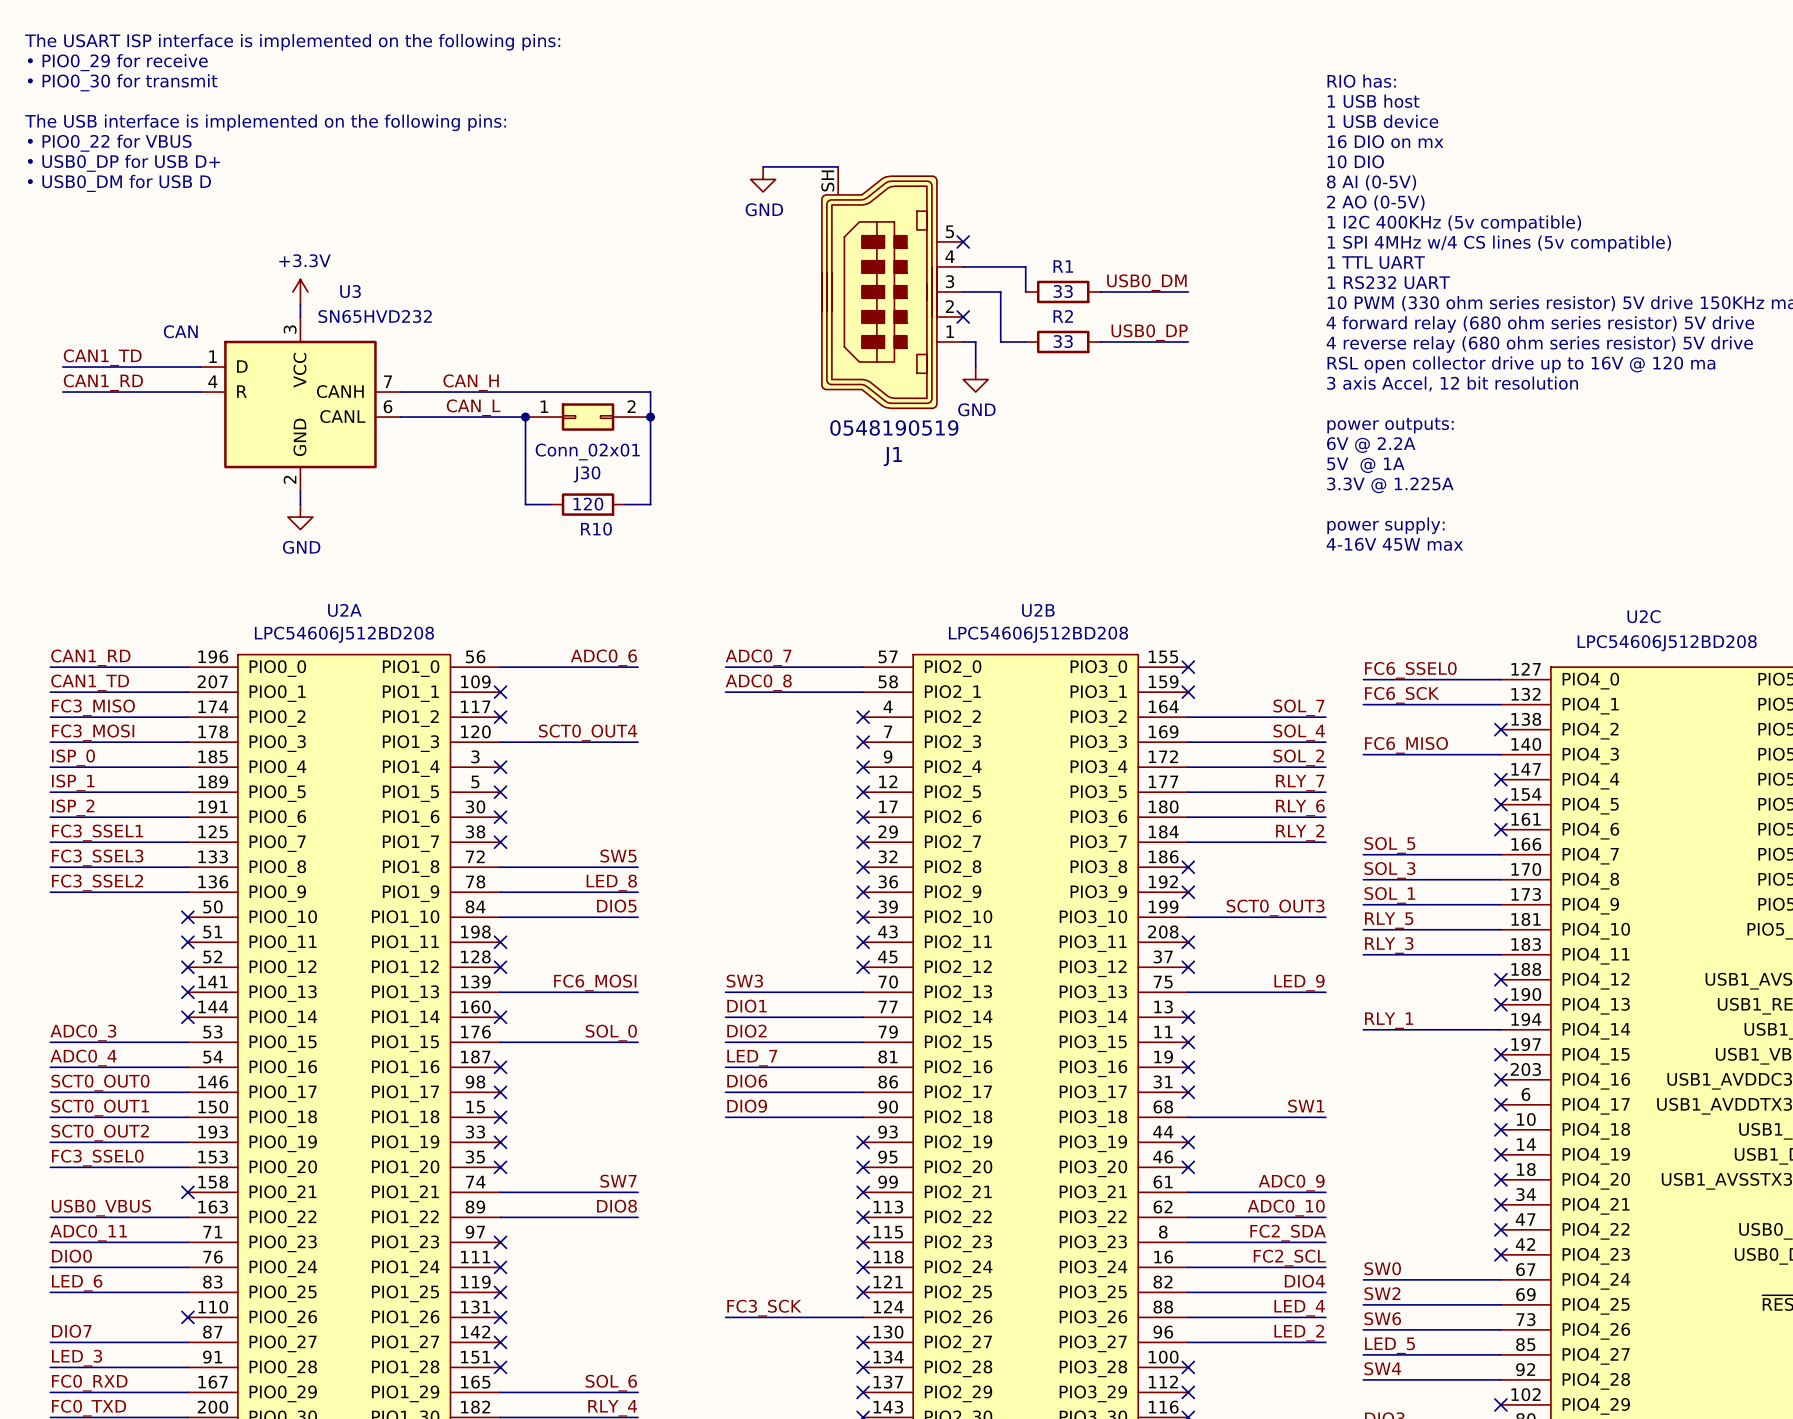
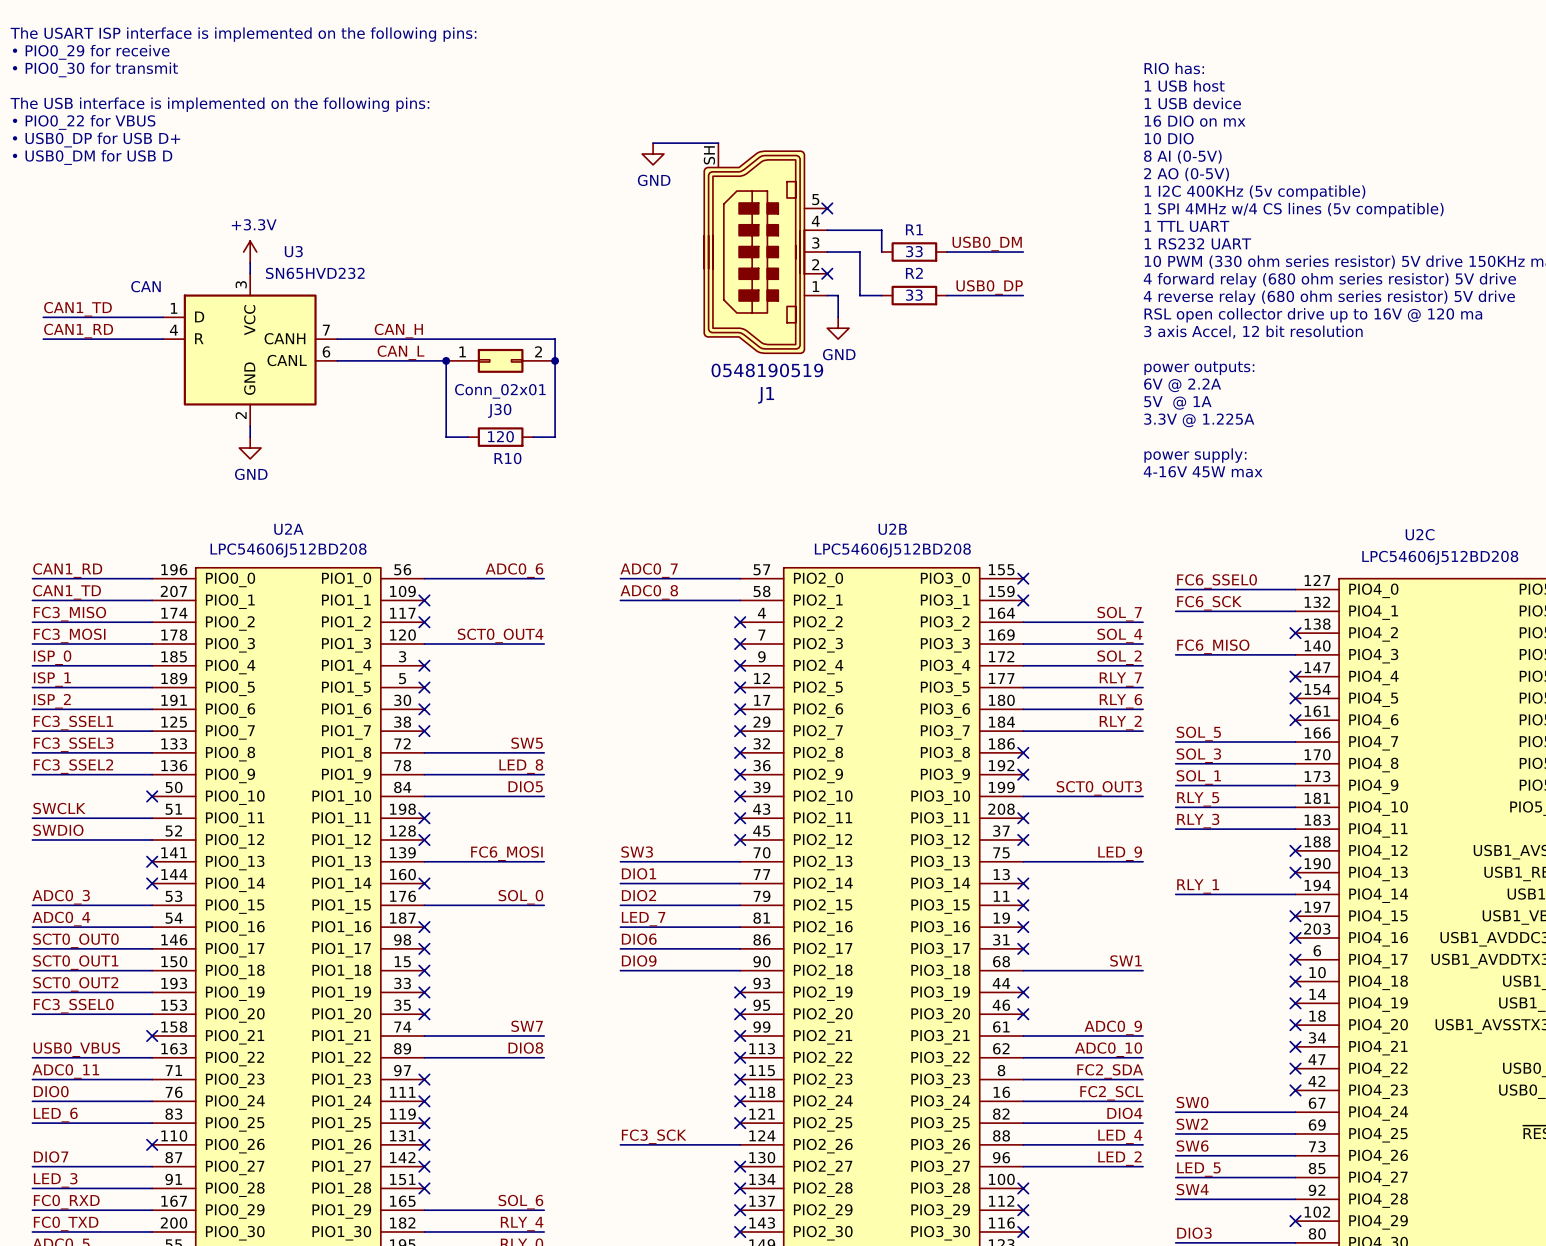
label: none -> SWCLK (59, 808)
wire: none -> (32, 818) (152, 818)
no-connect mark: (187, 942) -> none
label: none -> SWDIO (58, 830)
wire: none -> (32, 840) (152, 840)
no-connect mark: (187, 967) -> none

